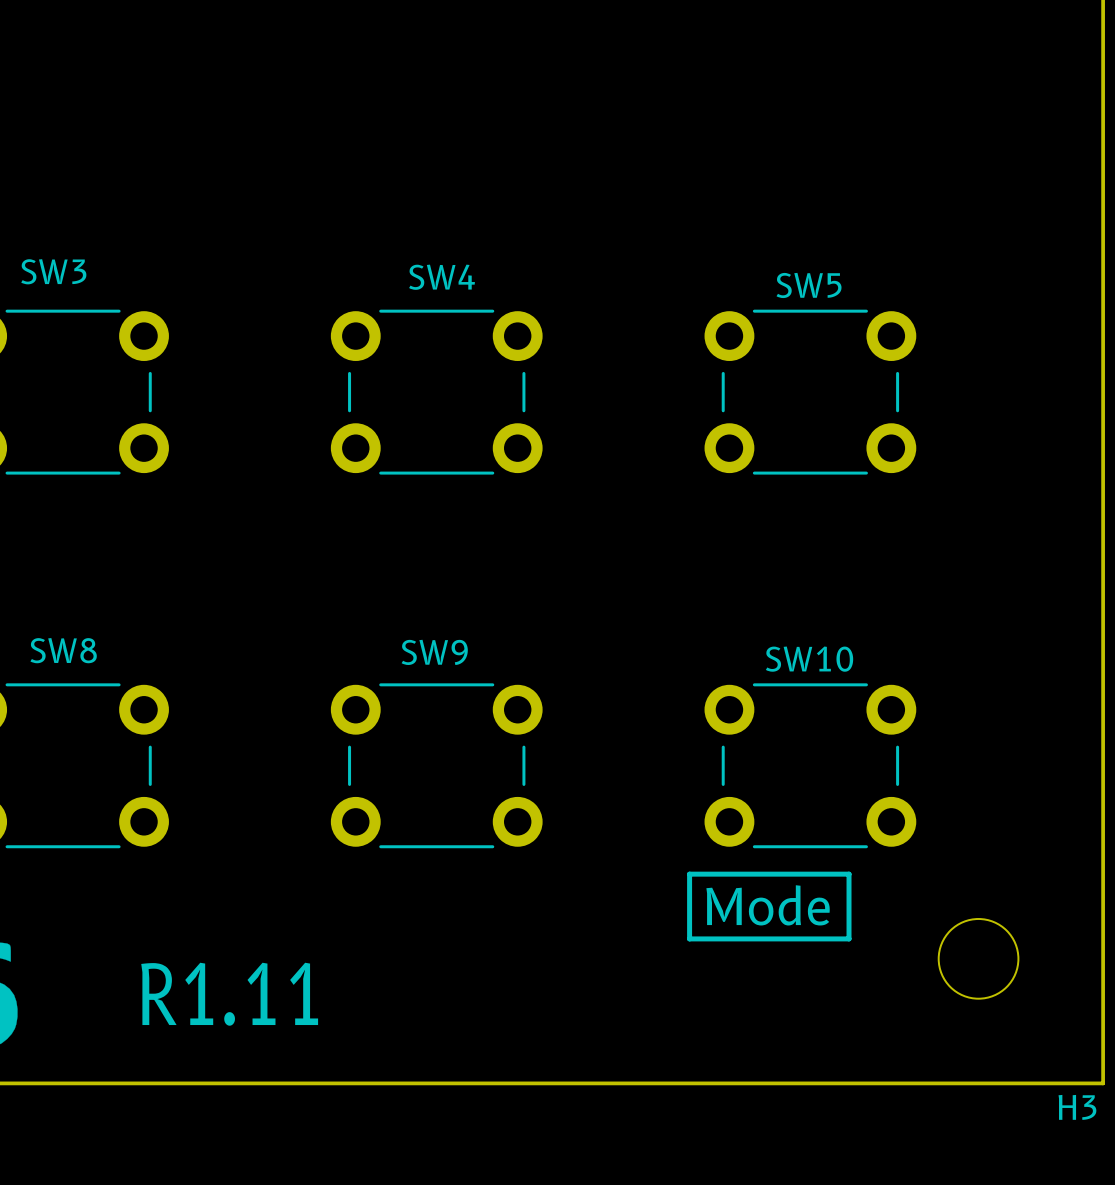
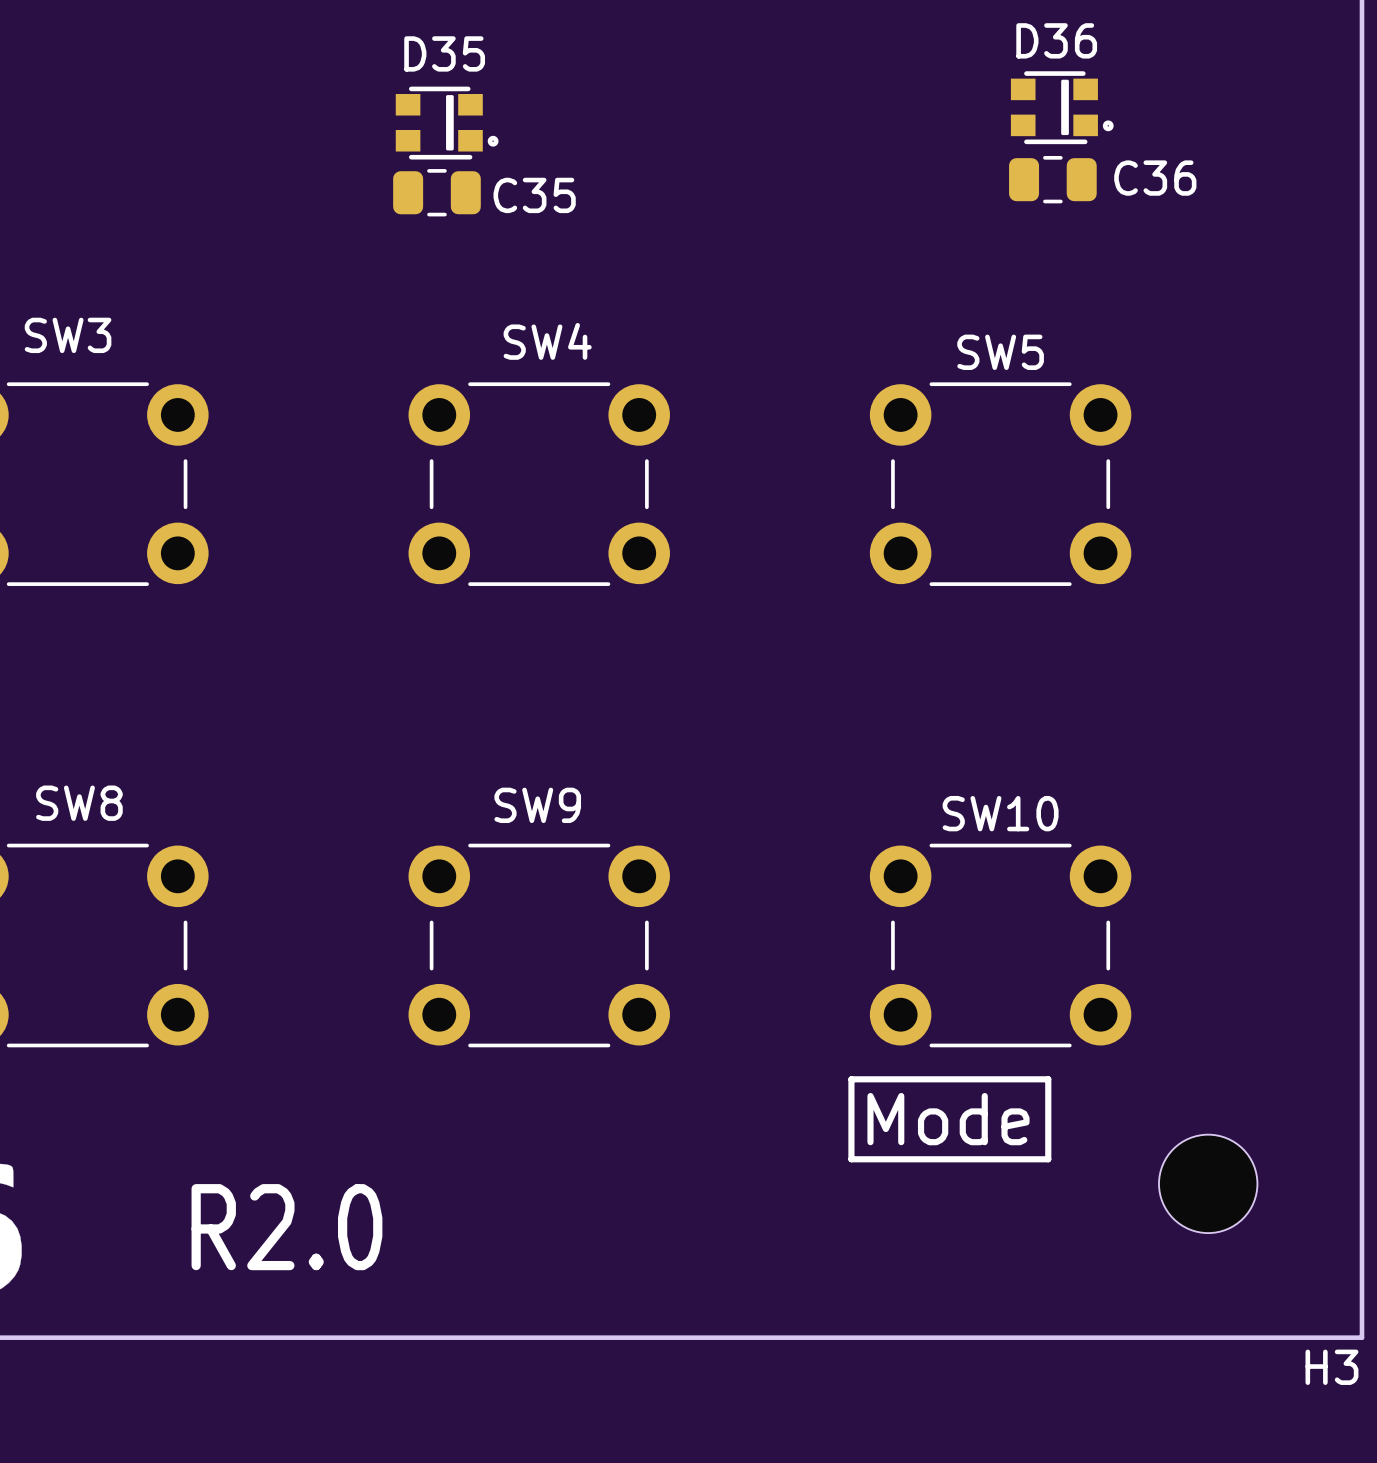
D36: none -> (1062, 107)
D35: none -> (447, 123)
C36: none -> (1052, 179)
C35: none -> (436, 192)
text: R1.11 (229, 994) -> R2.0 (286, 1227)

